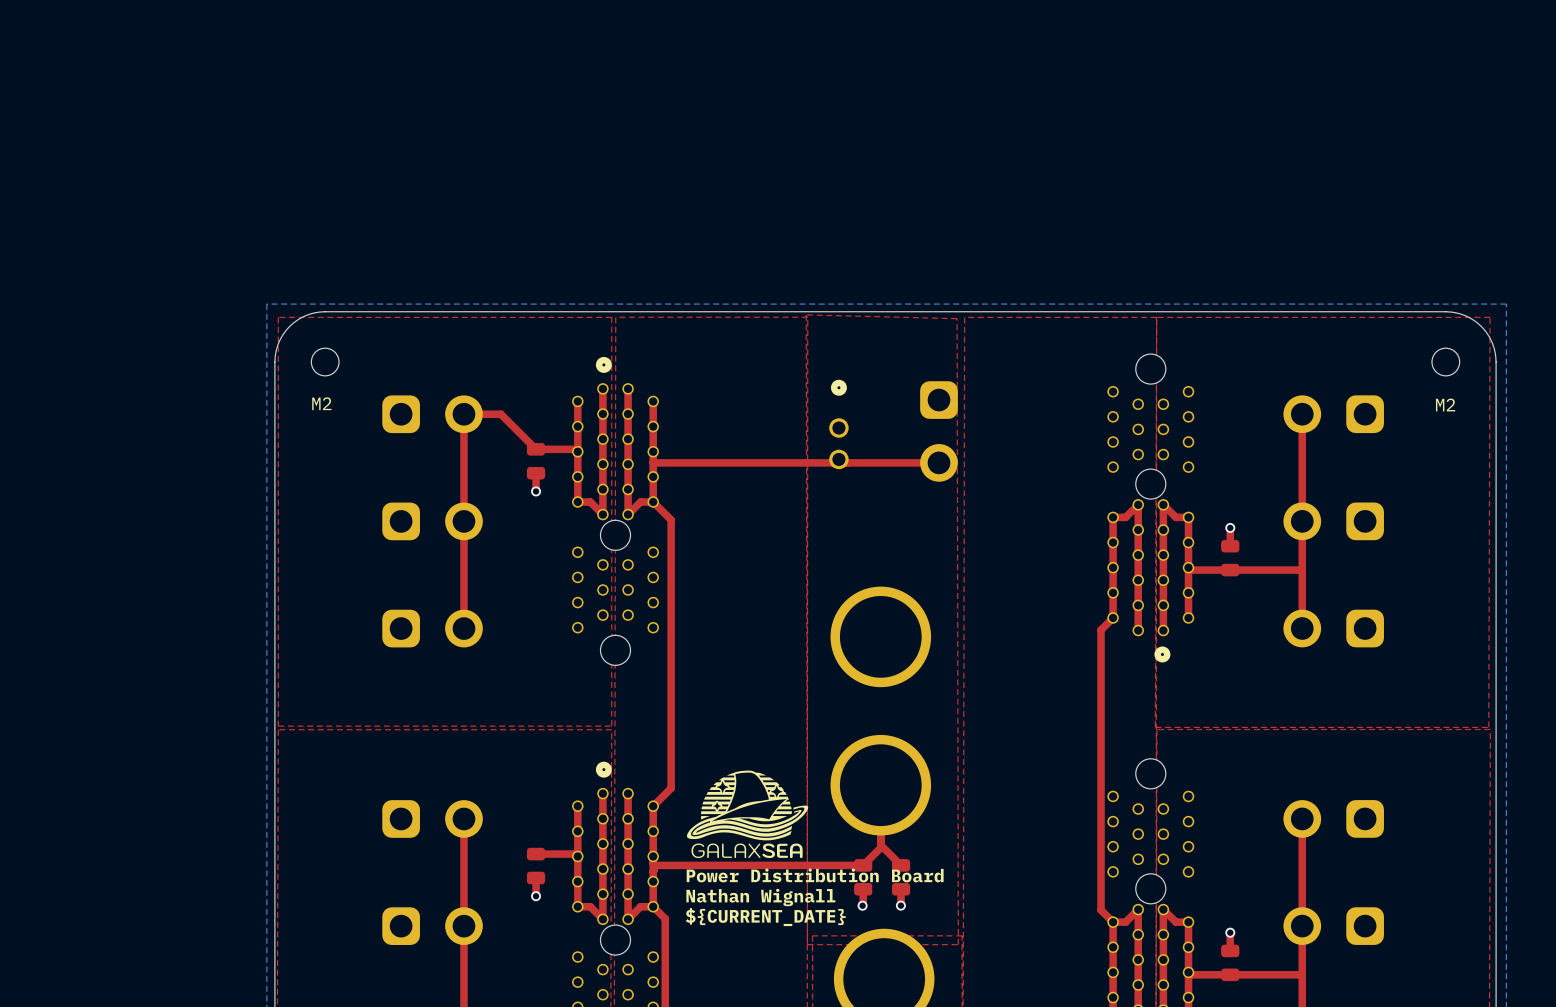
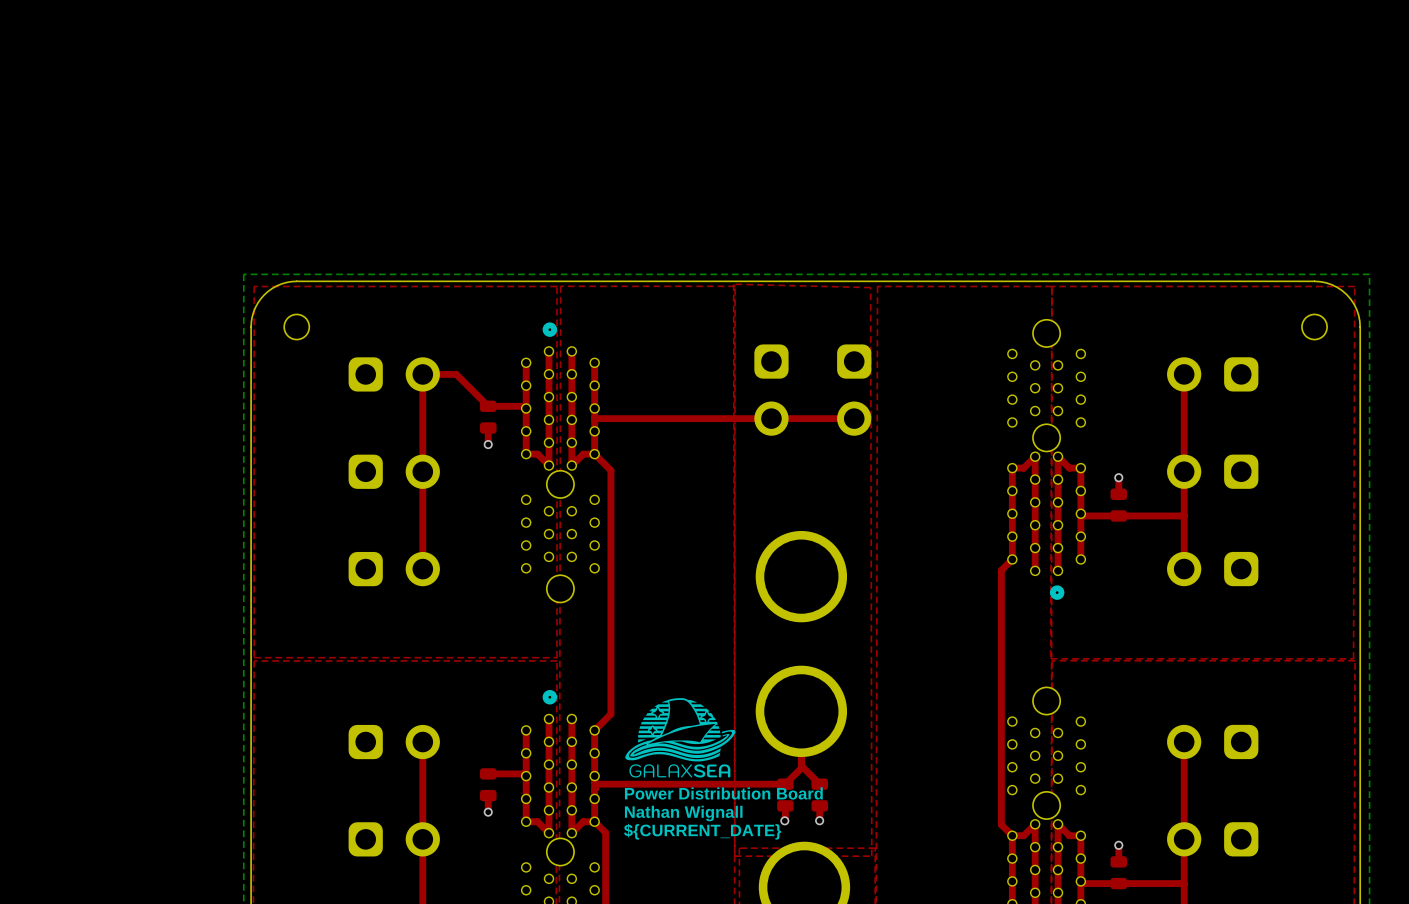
part footprint: [829, 379, 849, 470] -> [754, 344, 789, 436]
text: M2 (321, 403) -> none
text: M2 (1445, 405) -> none

